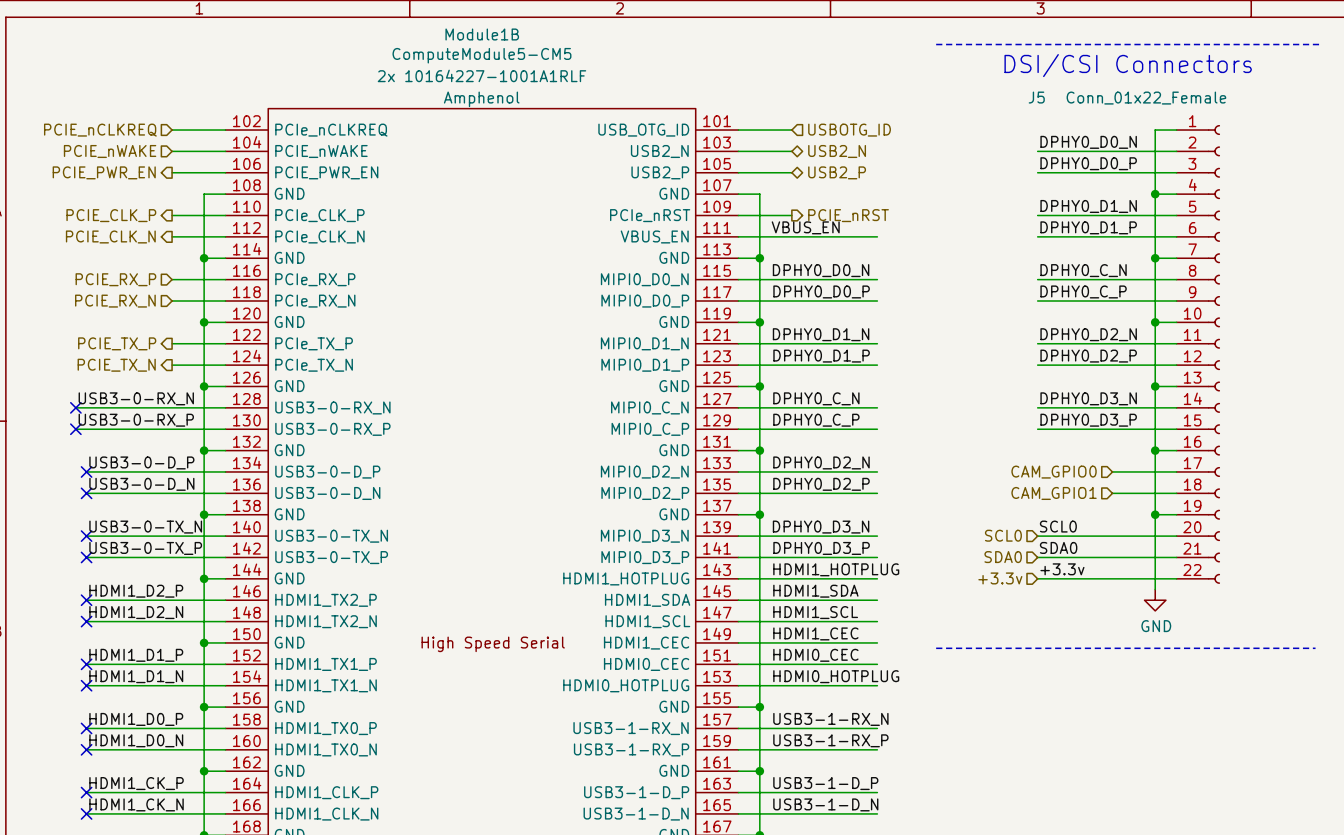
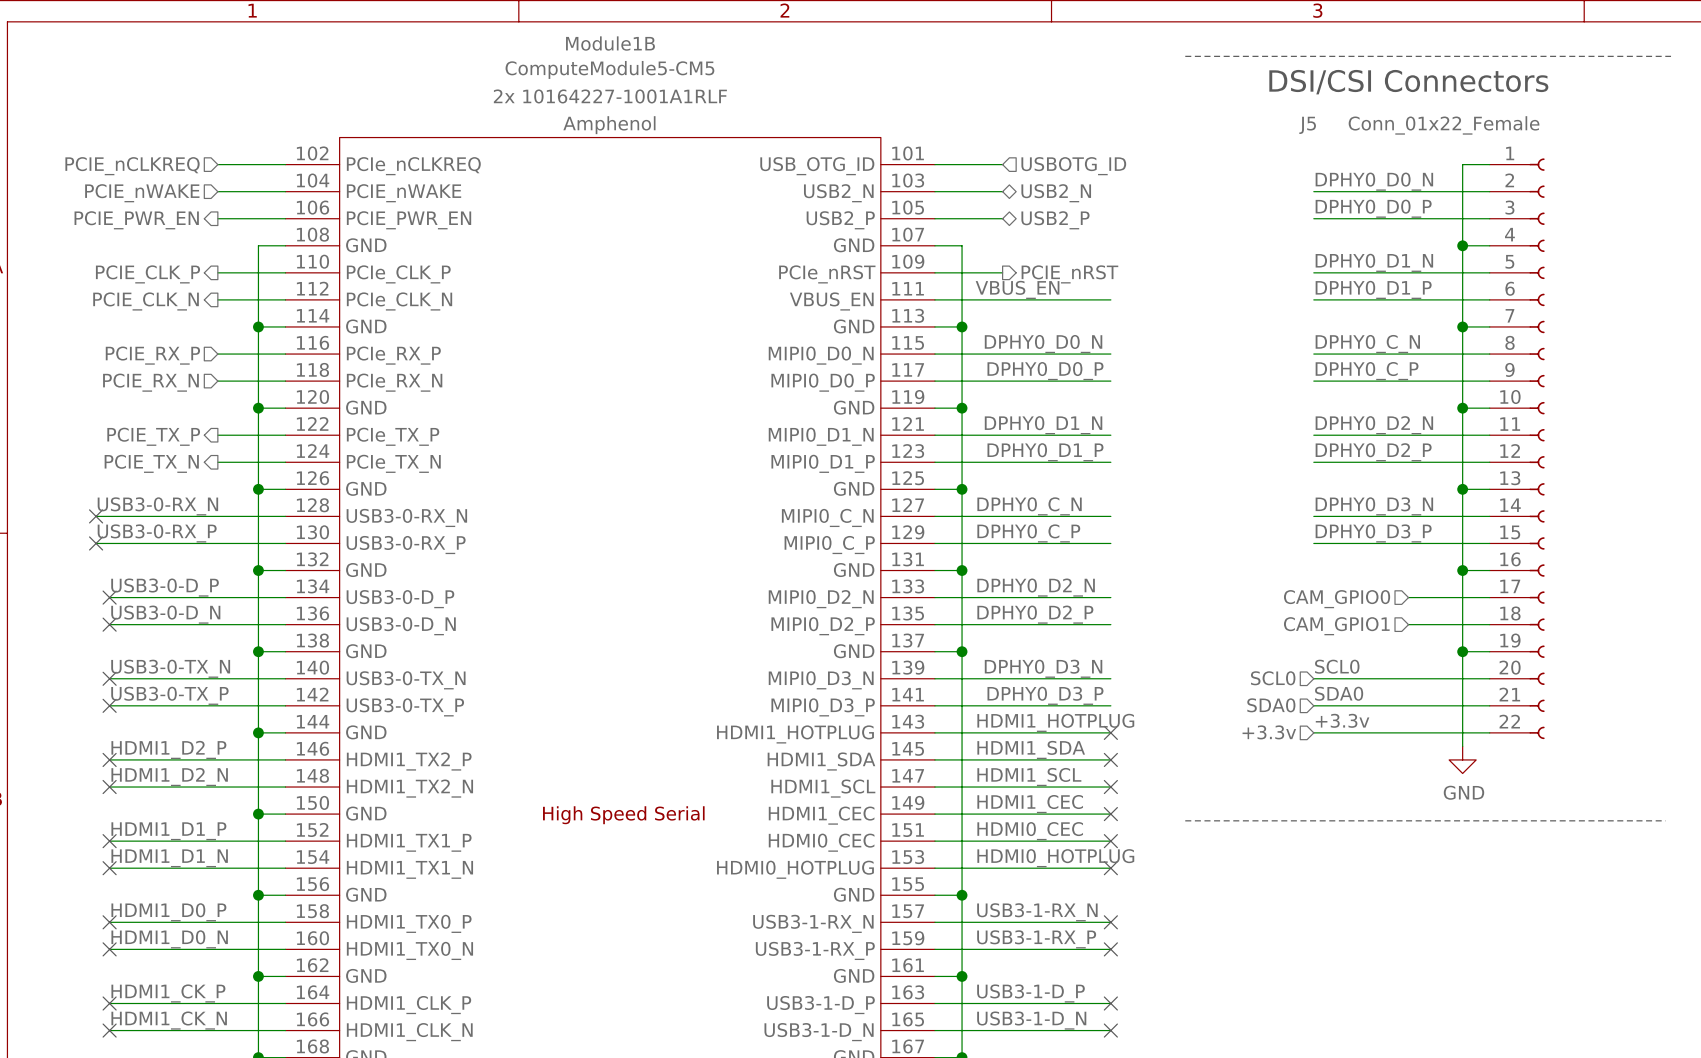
no-connect mark: none -> (1110, 732)
no-connect mark: none -> (1110, 759)
no-connect mark: none -> (1110, 787)
no-connect mark: none -> (1110, 814)
no-connect mark: none -> (1110, 841)
no-connect mark: none -> (1110, 868)
no-connect mark: none -> (1110, 922)
no-connect mark: none -> (1110, 949)
no-connect mark: none -> (1110, 1003)
no-connect mark: none -> (1110, 1030)

